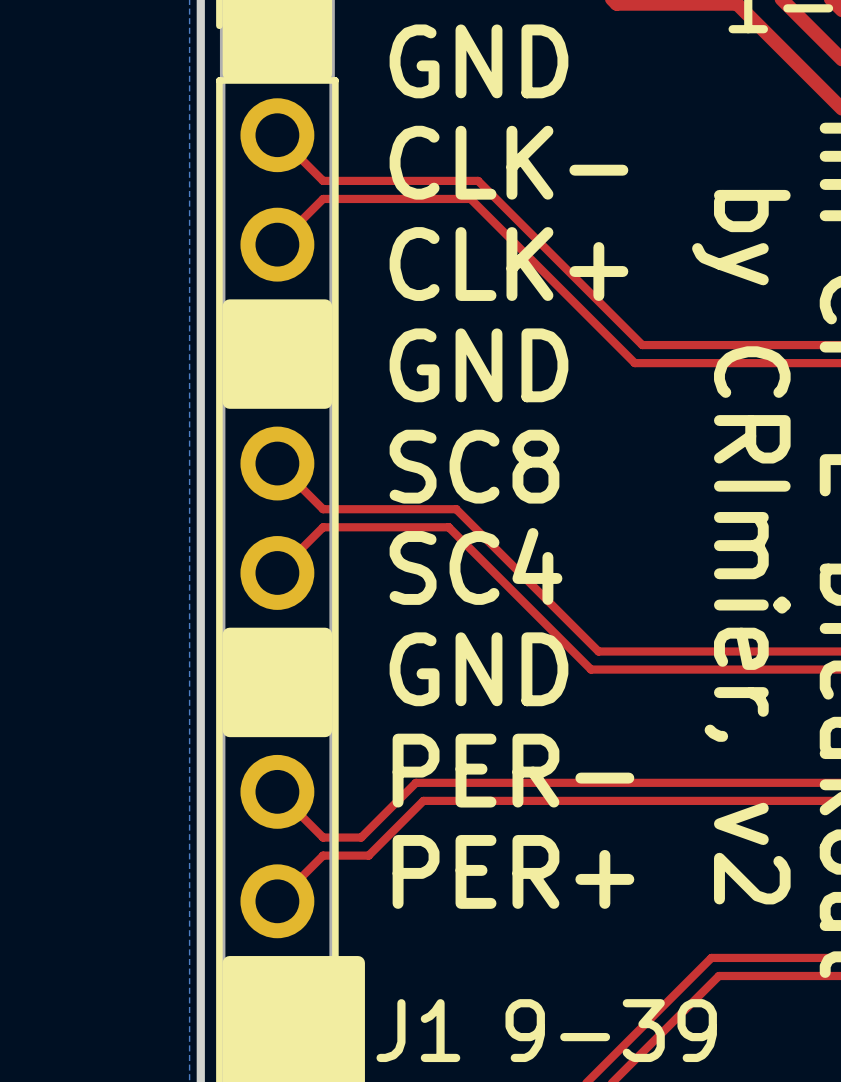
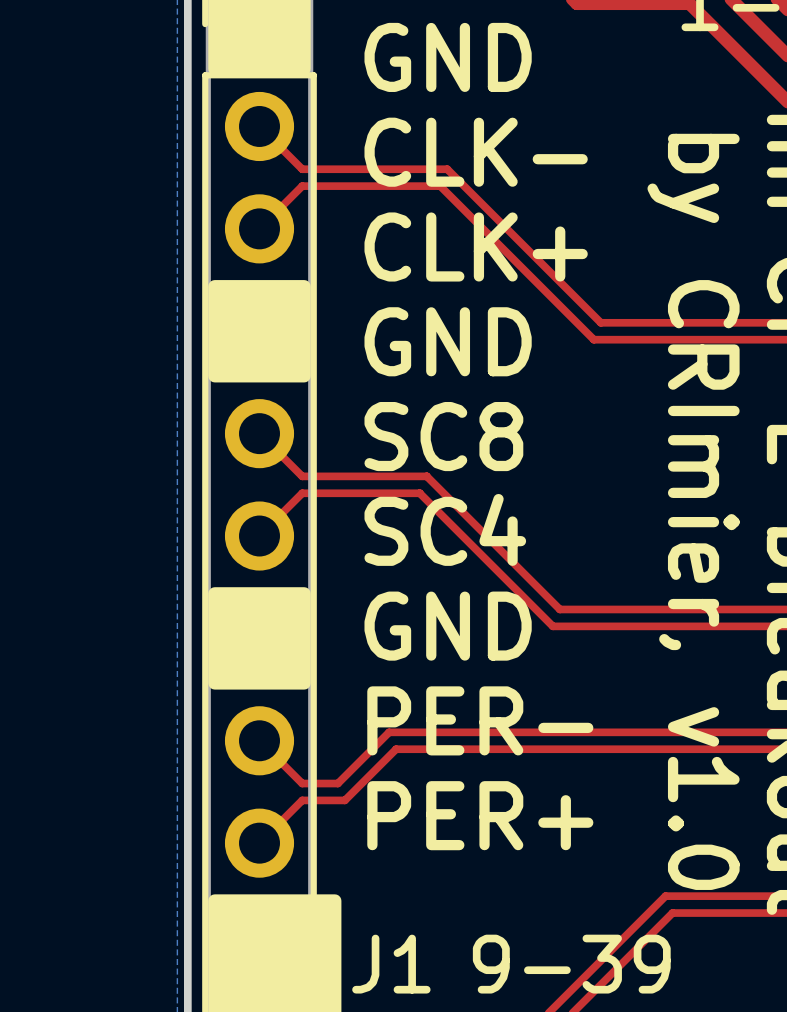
text: by CRImier, v2 (741, 547) -> by CRImier, v1.0 (693, 511)

